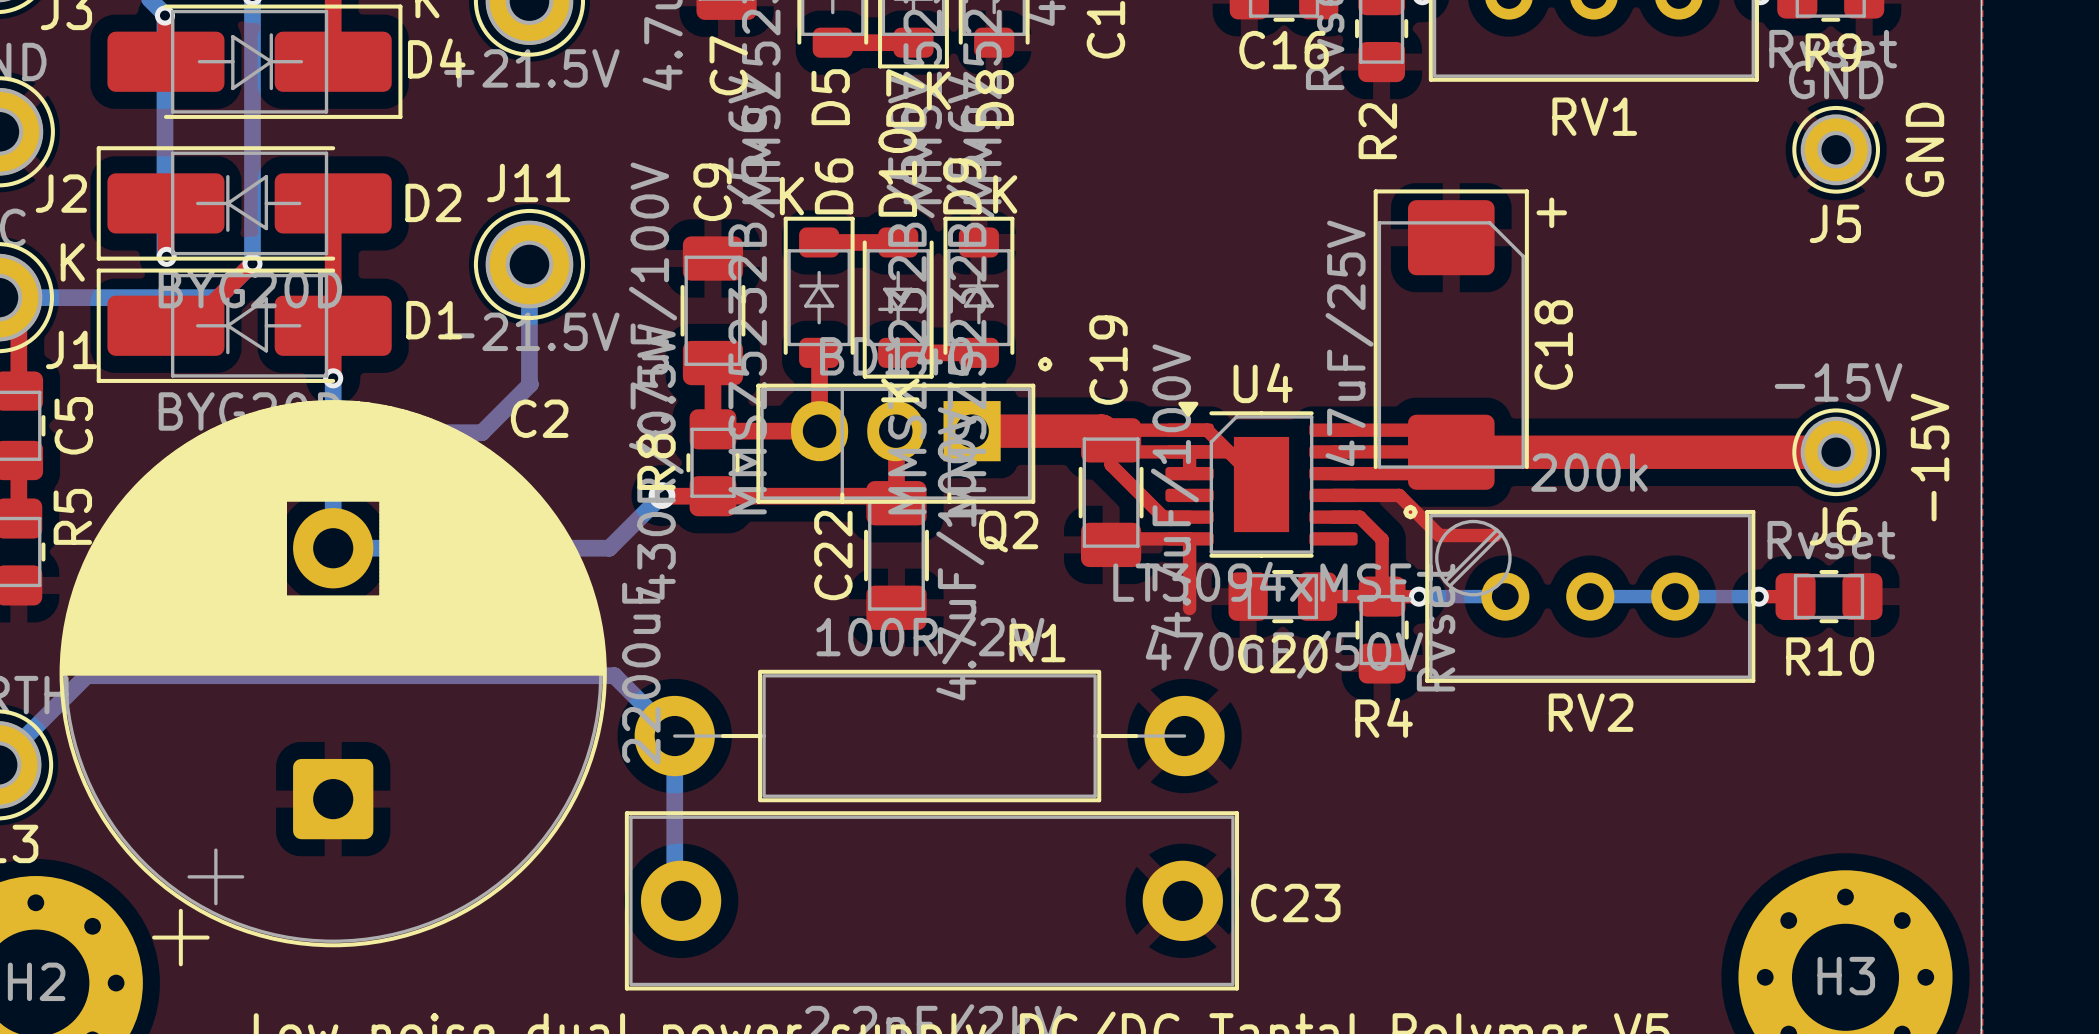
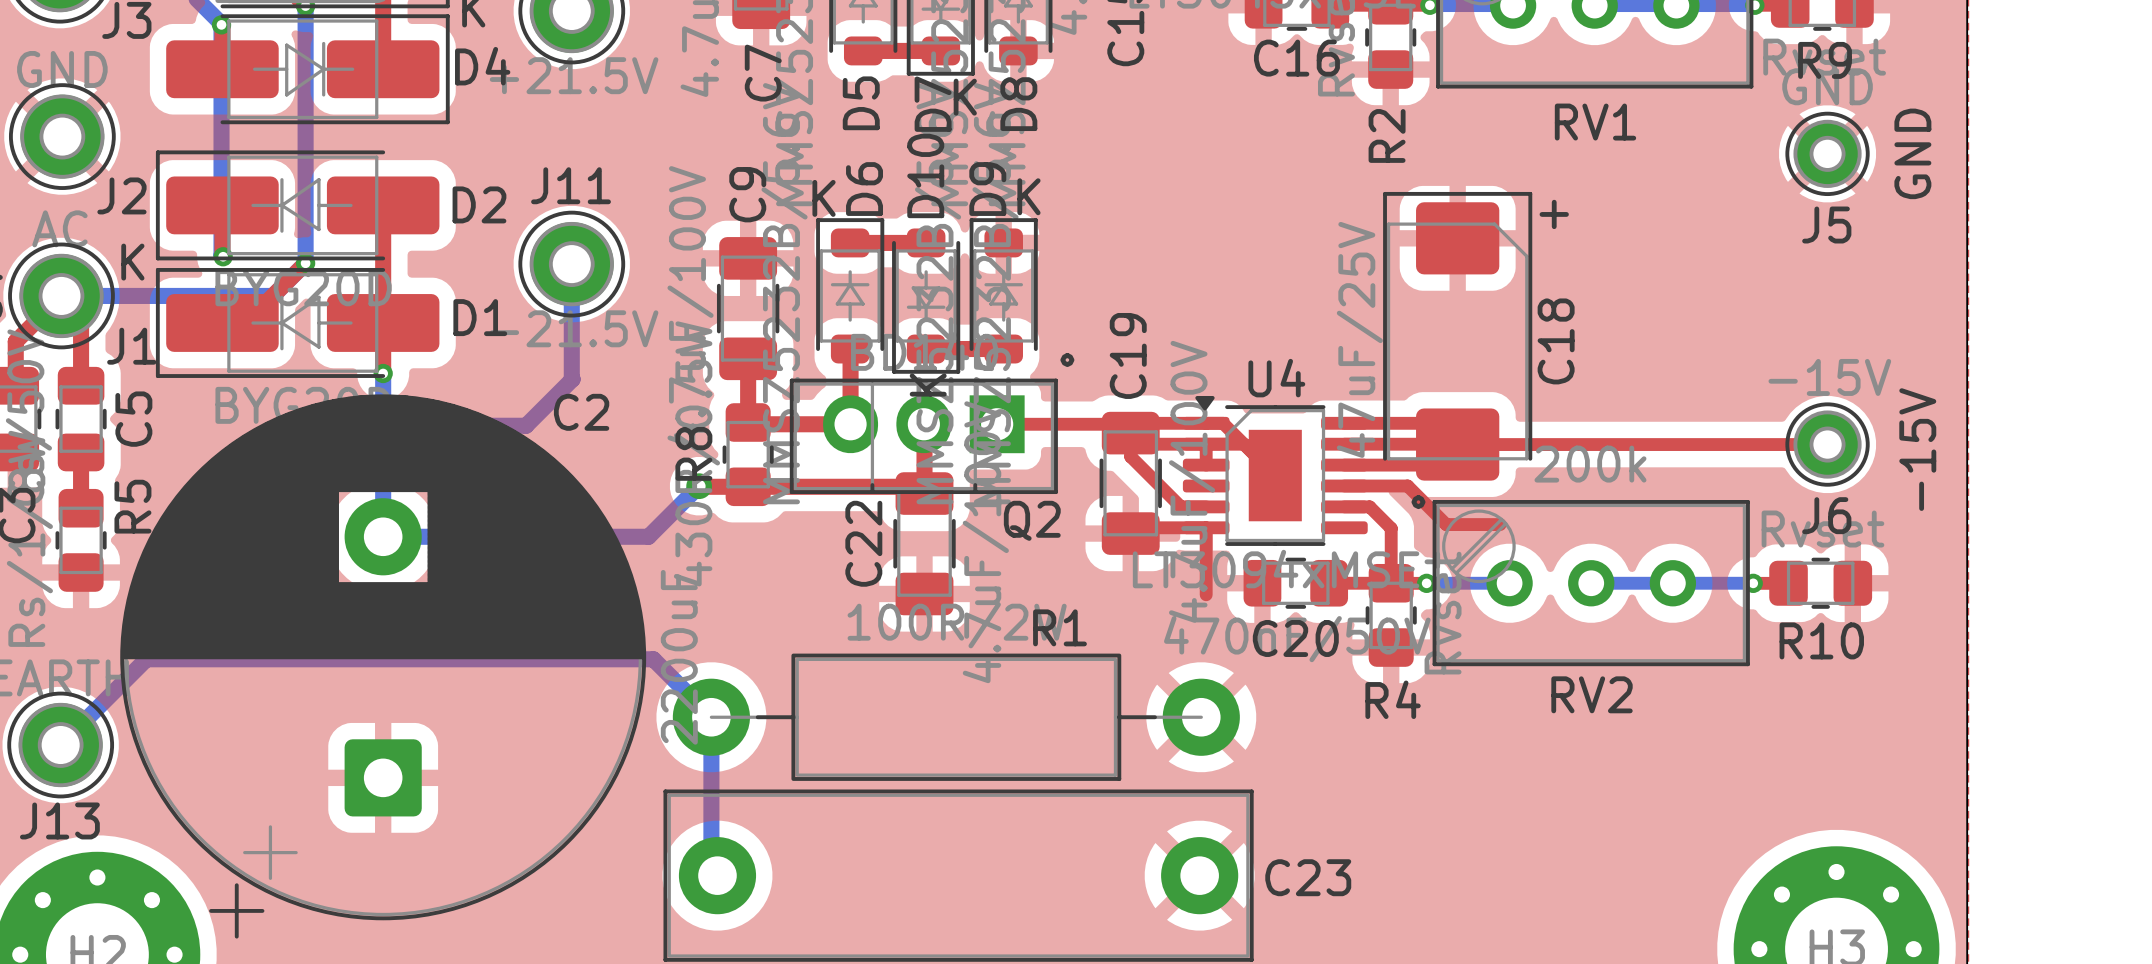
top track width: thick (972, 431) (1101, 431) (1111, 440) -> thin (997, 424) (1121, 424) (1130, 433)
top track width: thick (1451, 452) (1836, 452) -> thin (1457, 444) (1827, 444)

